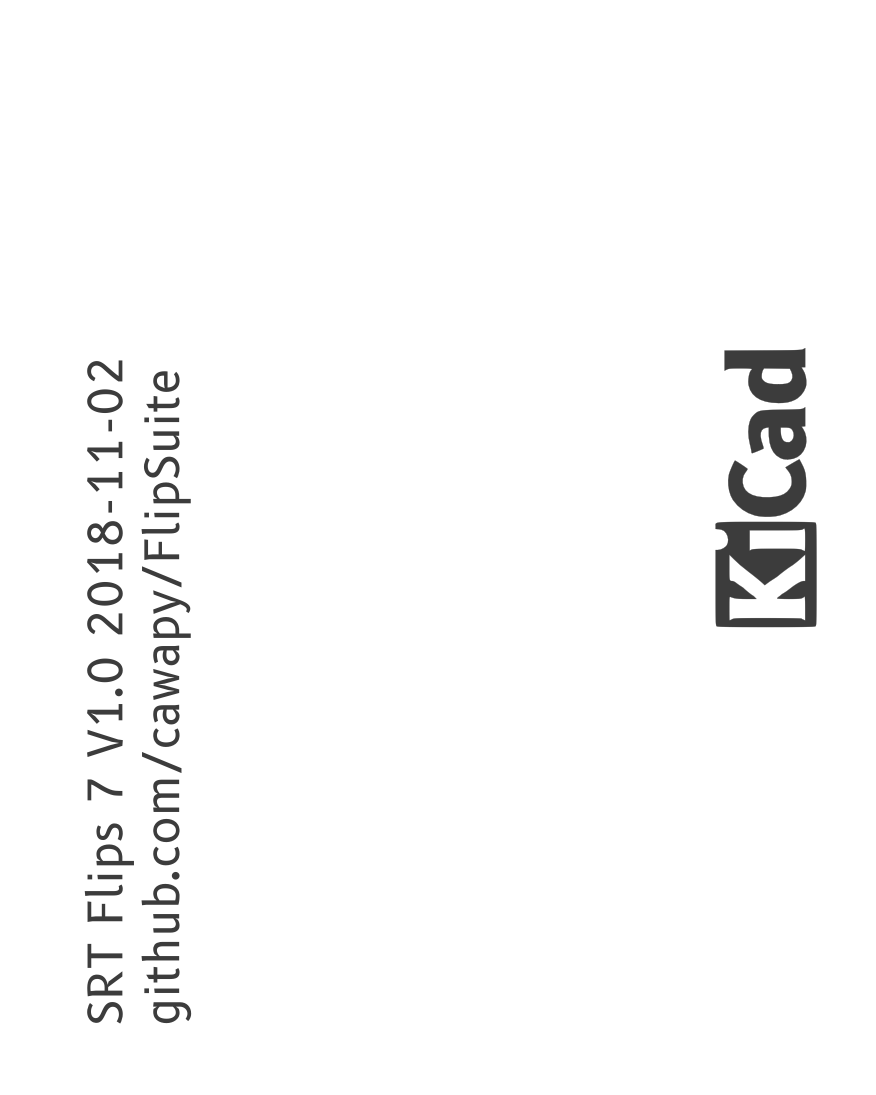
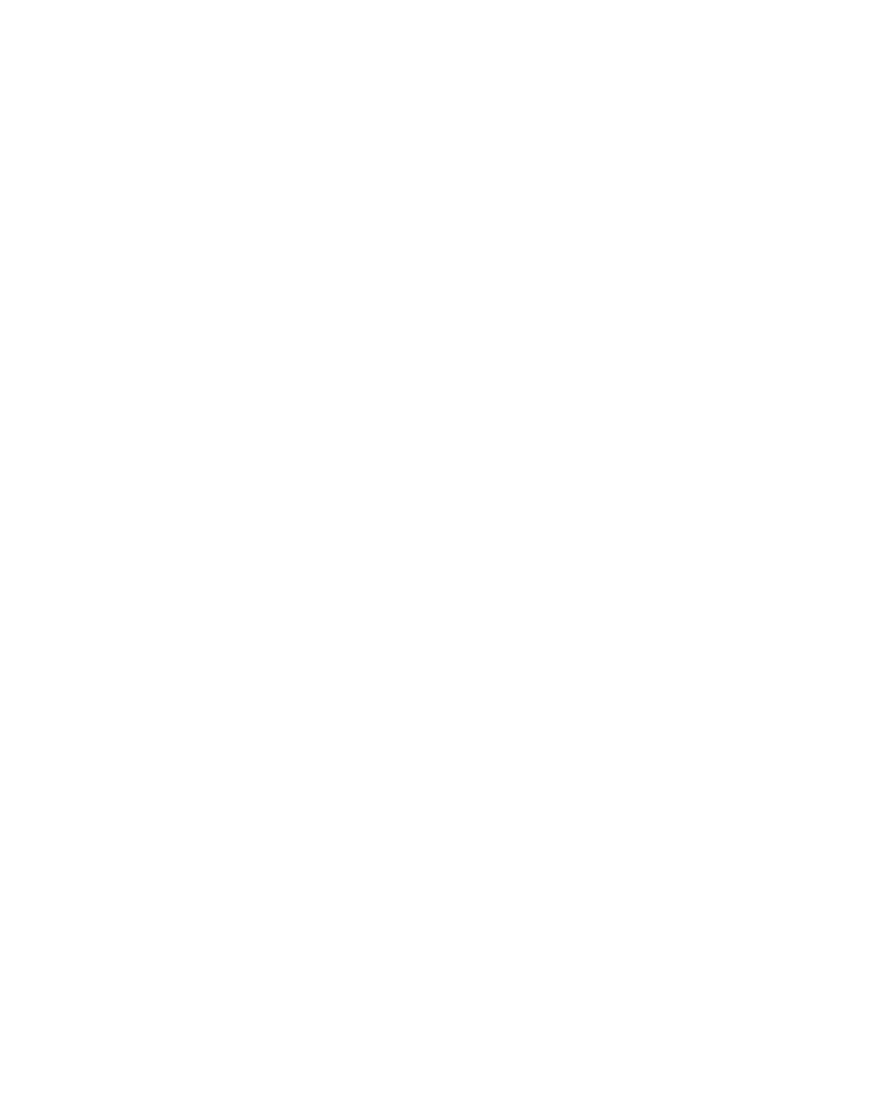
drawing: [715, 347, 817, 628] -> none
text: SRT Flips 7 V1.0 2018-11-02 (109, 691) -> none
text: github.com/cawapy/FlipSuite (166, 697) -> none

